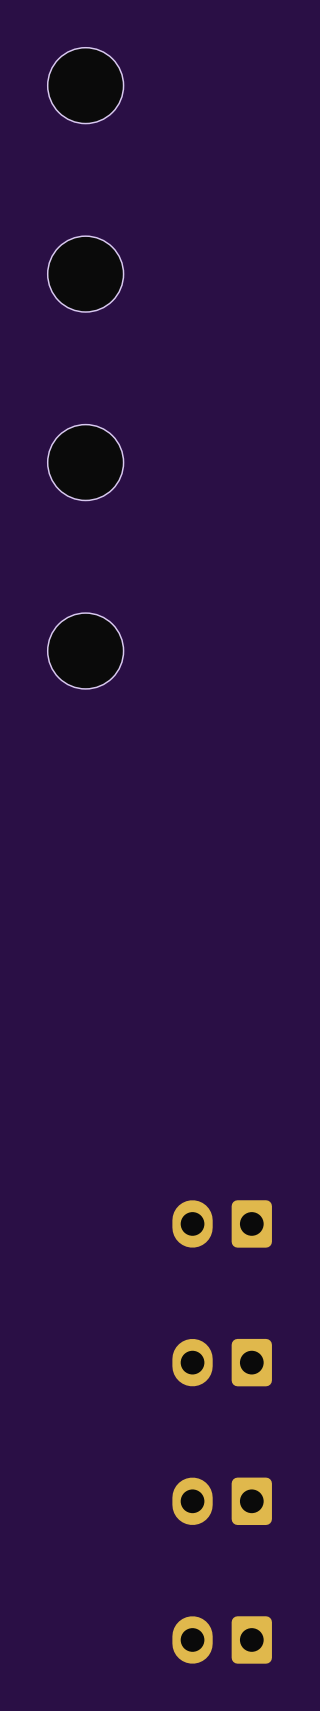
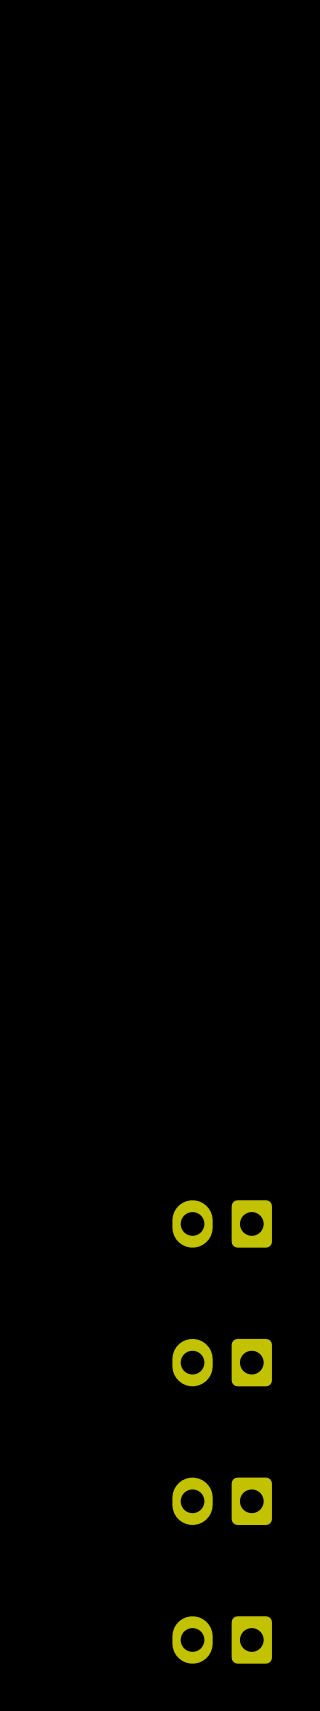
part: (85, 85) -> none
part: (85, 274) -> none
part: (85, 462) -> none
part: (85, 651) -> none

